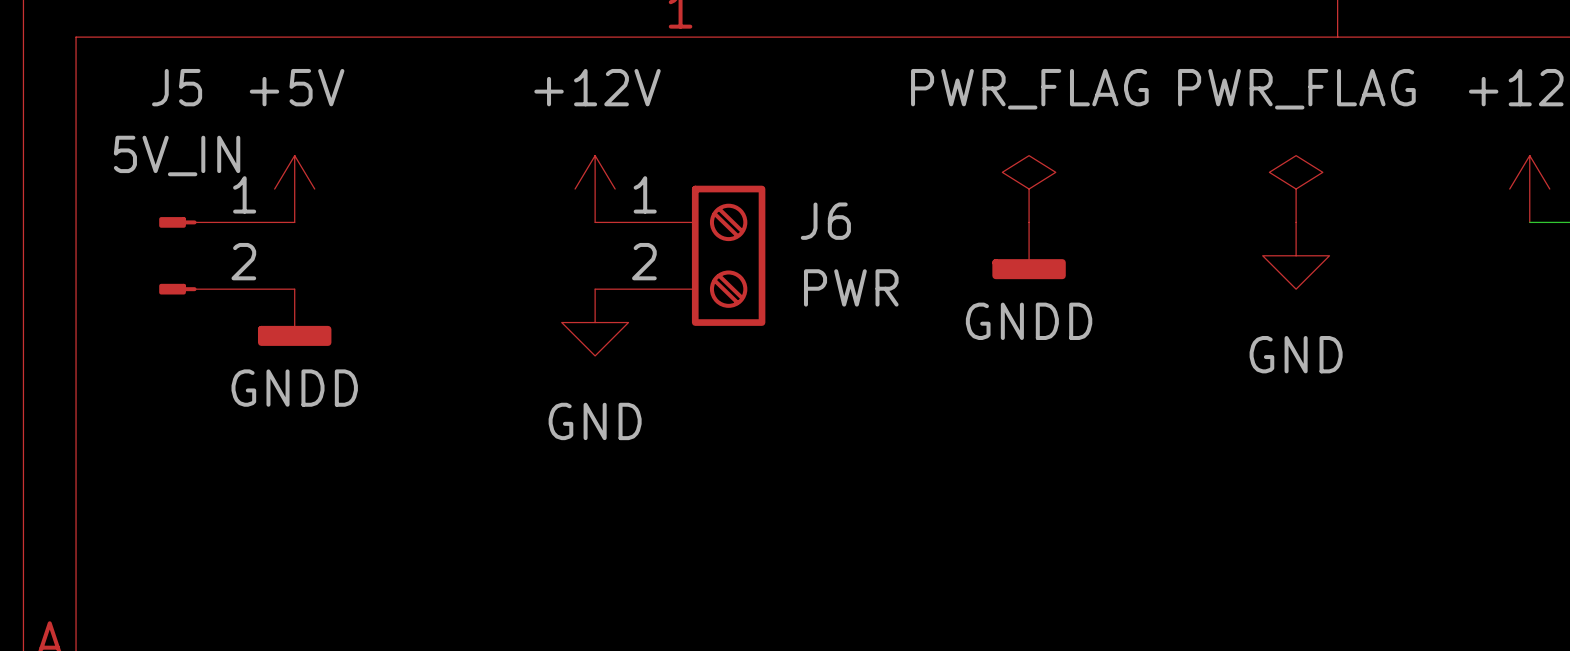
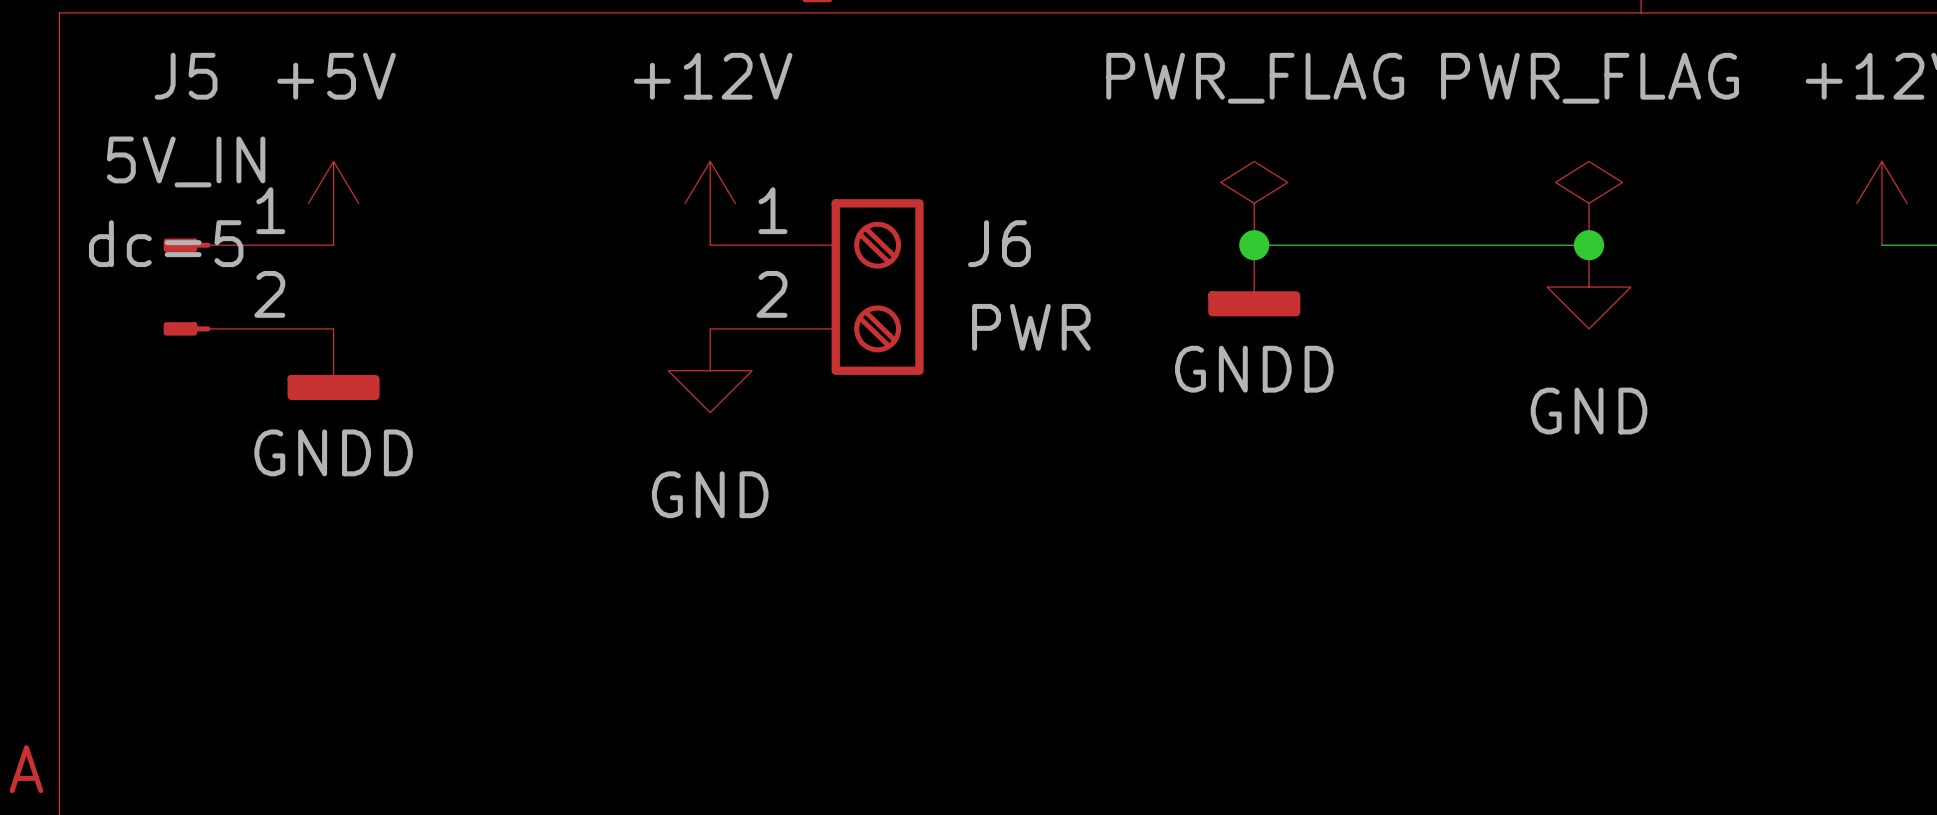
J5 text: none -> dc=5 (166, 243)
wire: none -> (1254, 245) (1589, 245)
junction: none -> (1254, 245)
junction: none -> (1589, 245)

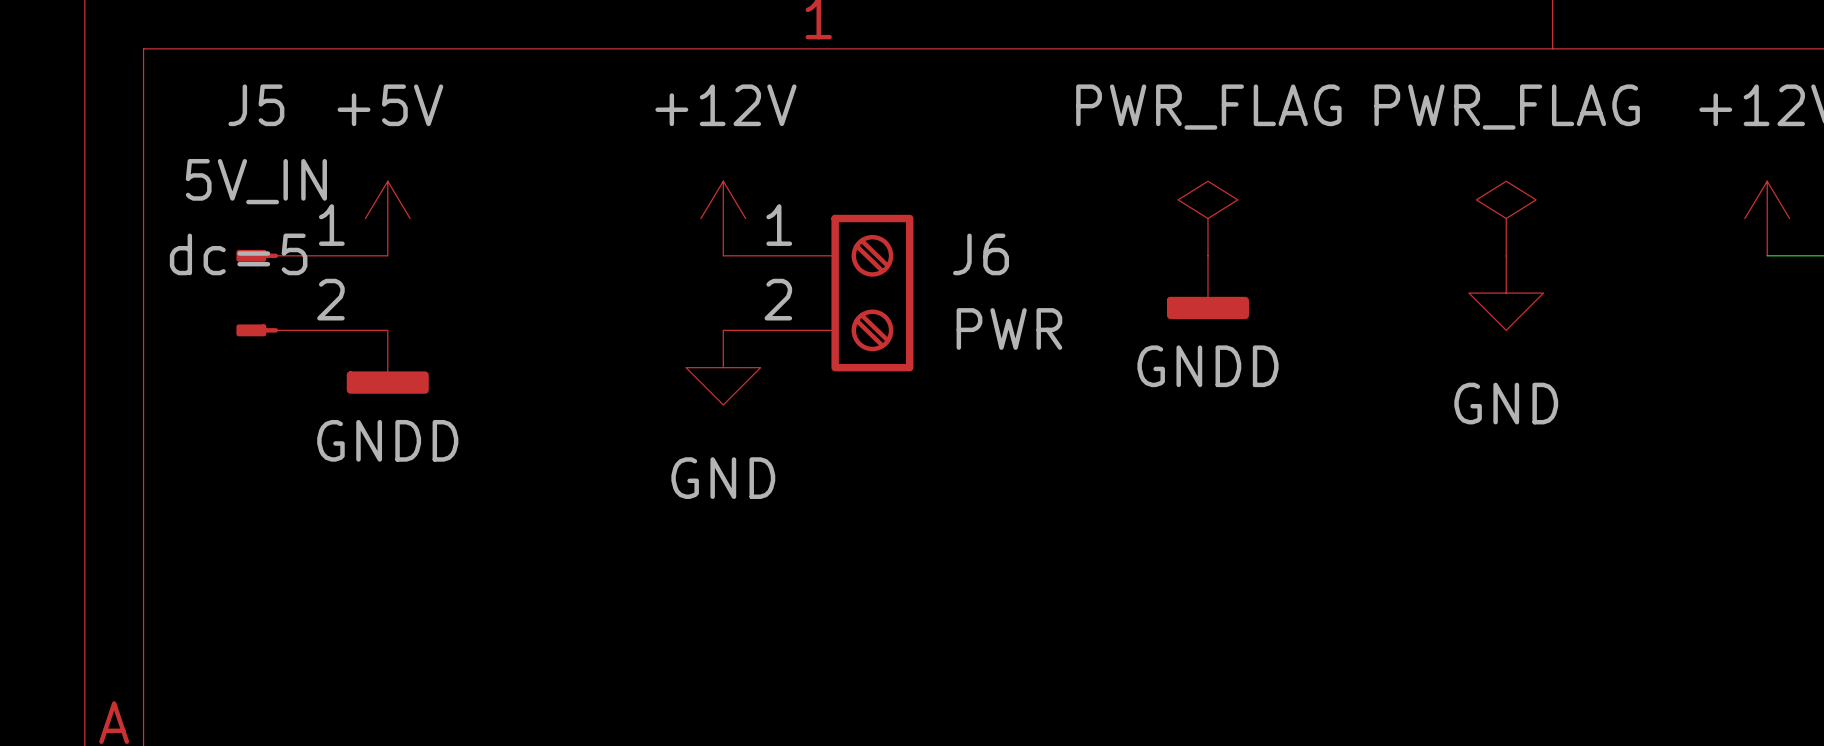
wire: (1254, 245) (1589, 245) -> none
junction: (1254, 245) -> none
junction: (1589, 245) -> none

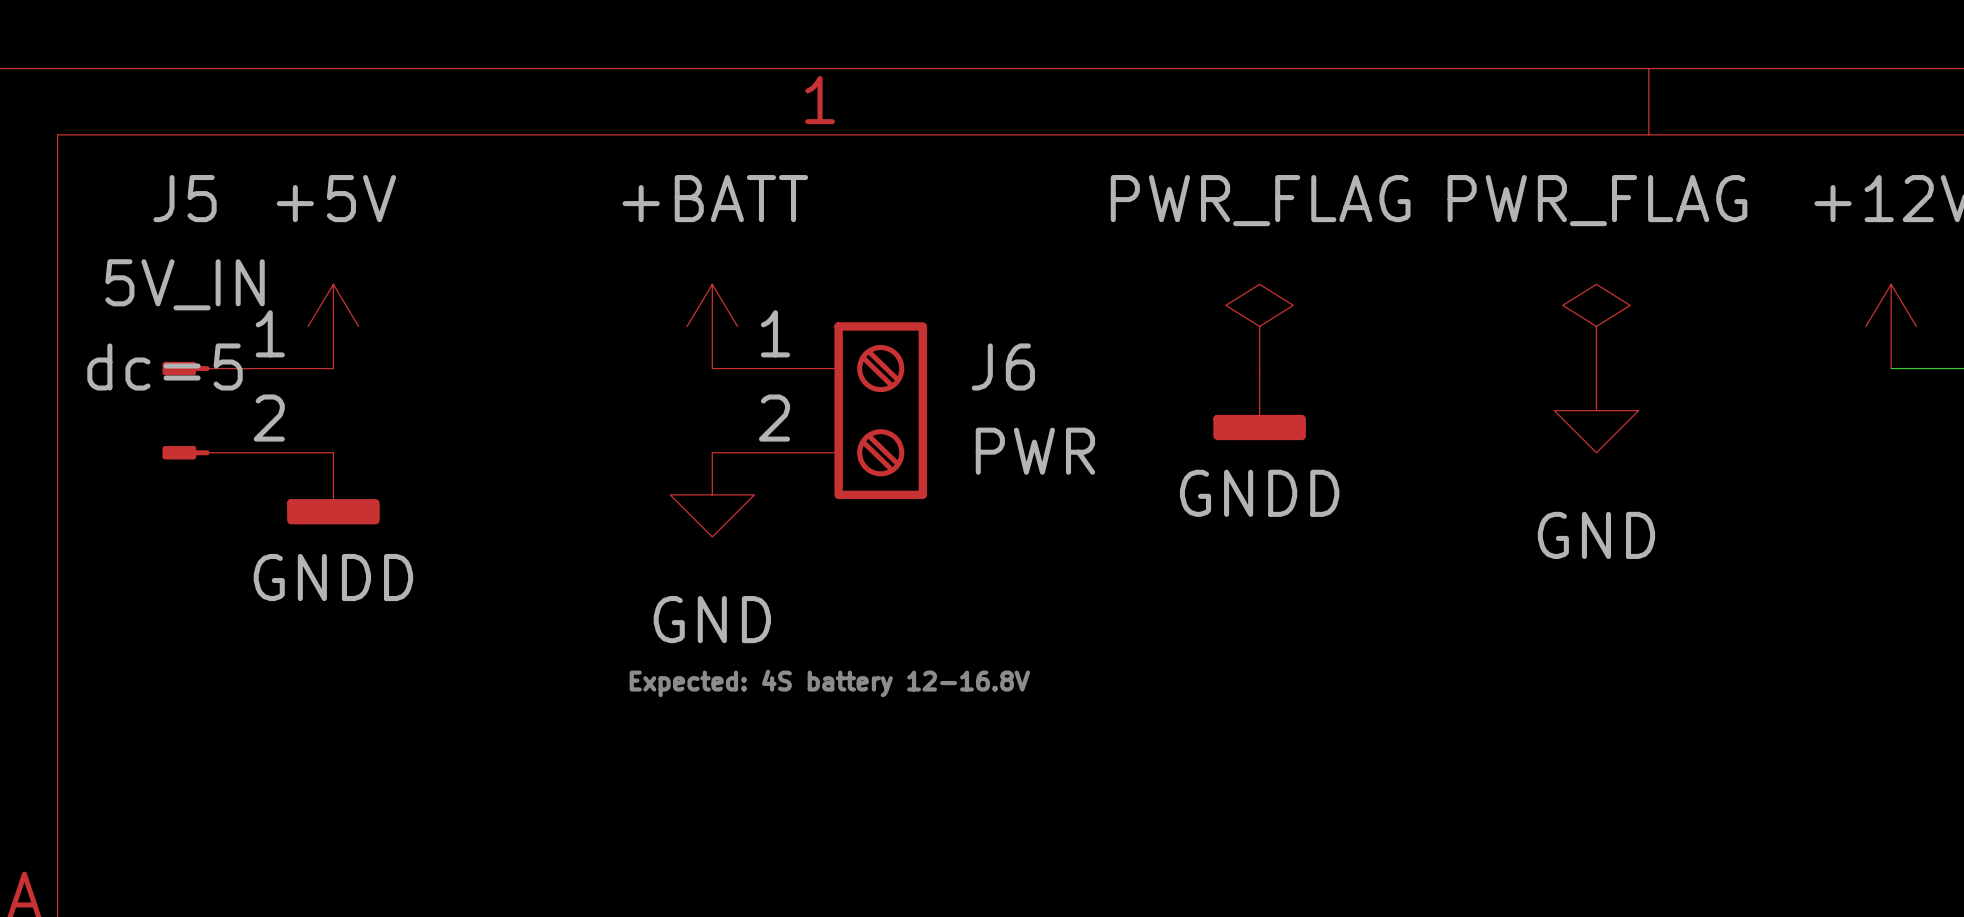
power symbol: +12V (723, 218) -> +BATT (712, 326)
text: none -> Expected: 4S battery 12-16.8V (829, 683)

